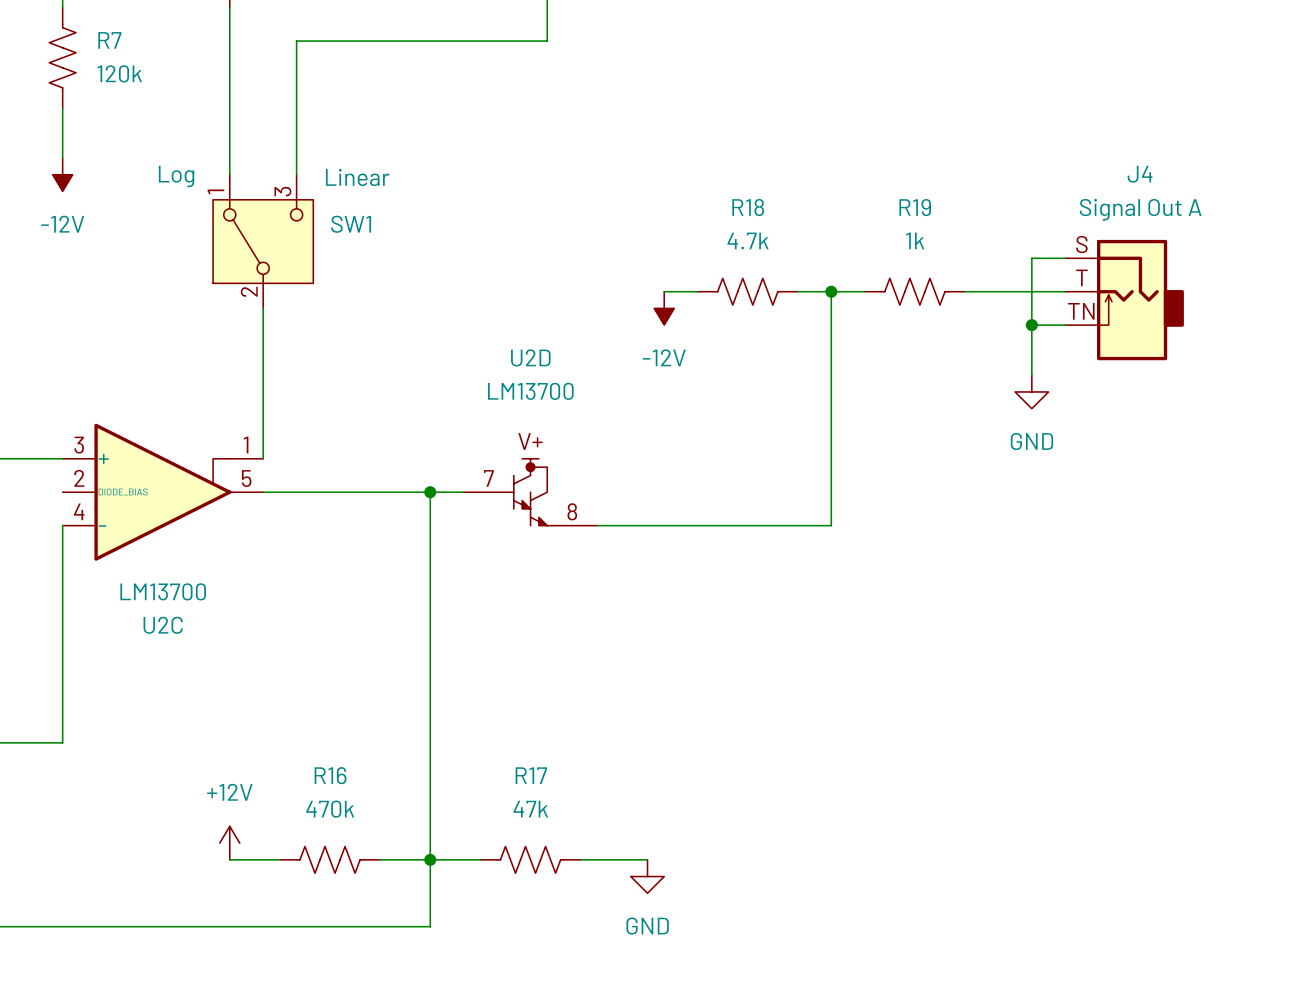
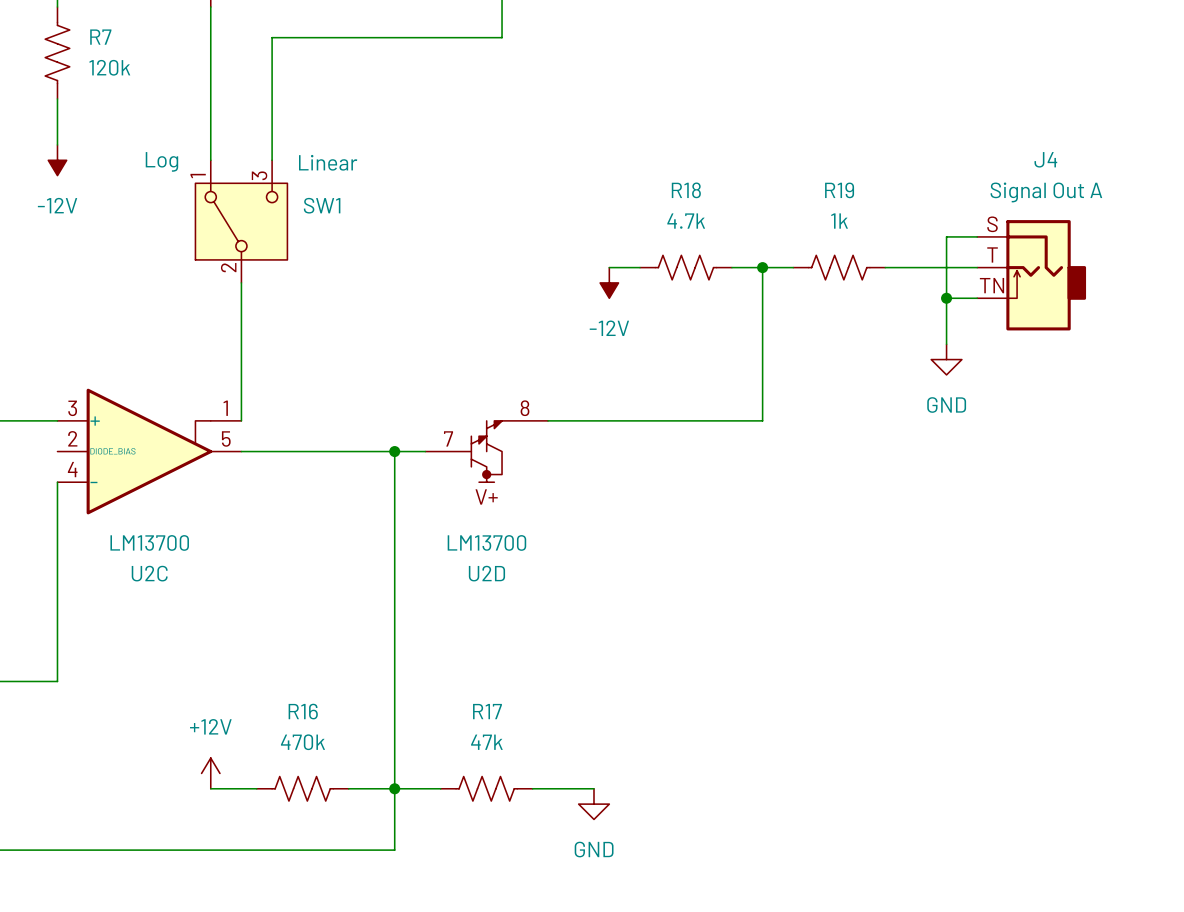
wire: (831, 458) (831, 525) (597, 525) -> (762, 420) (548, 420)
U2D flip: as is (530, 492) -> up-down (486, 451)

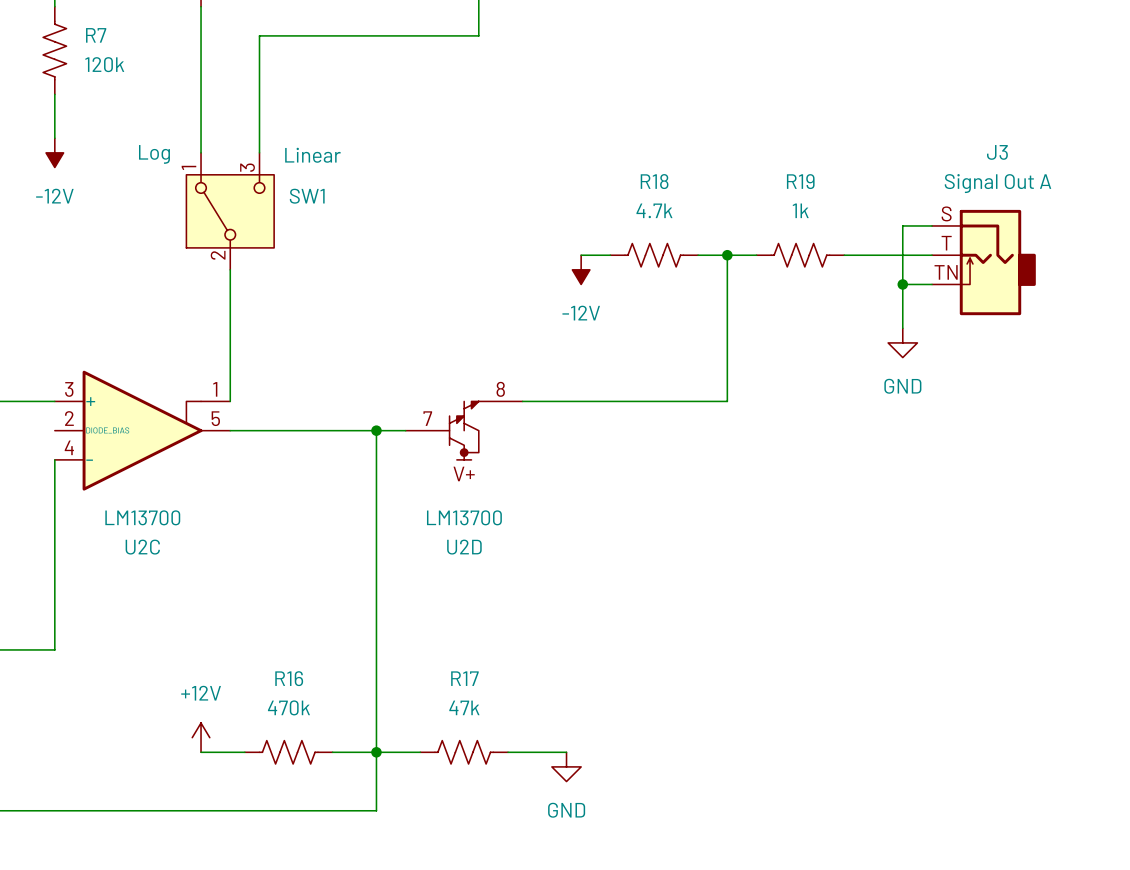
J4 name: J4 (1045, 159) -> J3 (997, 152)

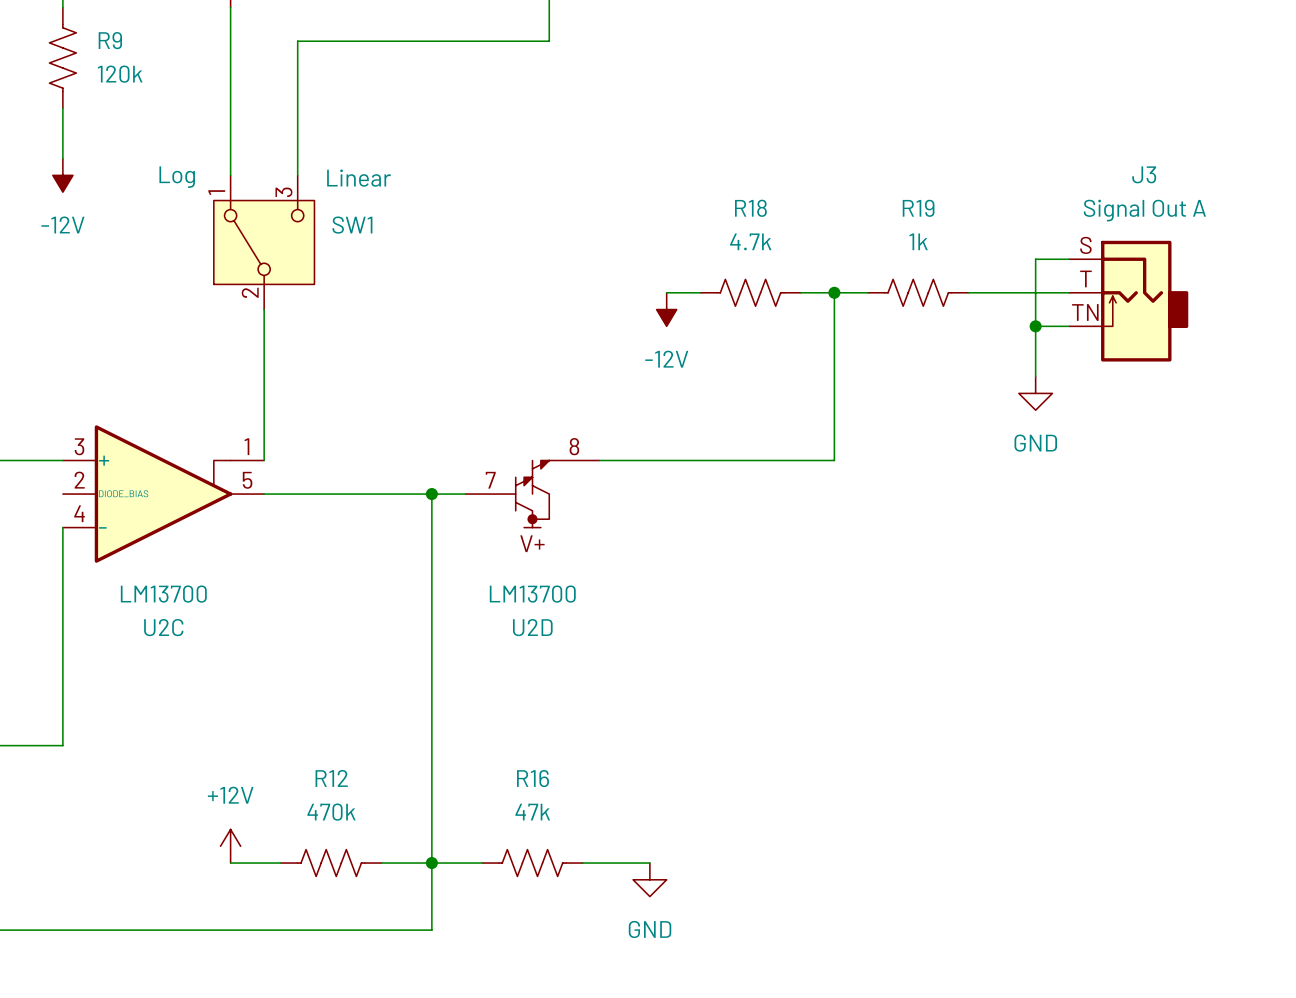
R7 name: R7 (96, 35) -> R9 (110, 40)
R16 name: R16 (289, 678) -> R12 (331, 778)
R17 name: R17 (464, 678) -> R16 (533, 778)

